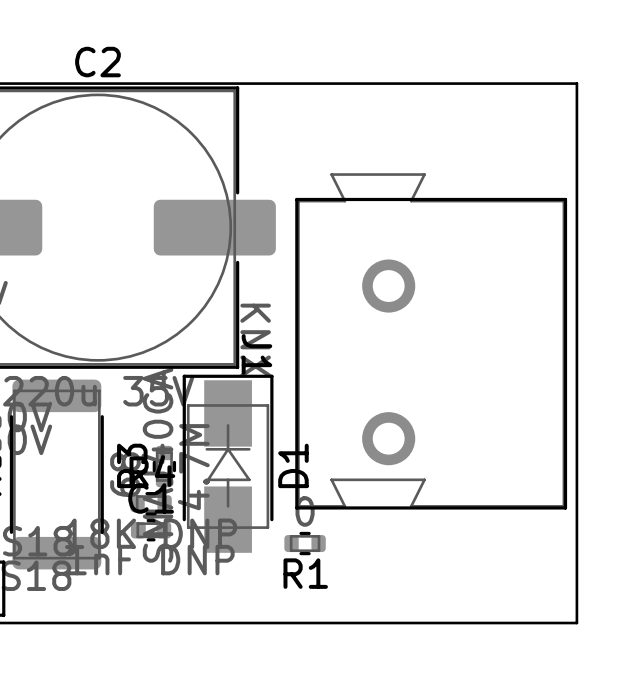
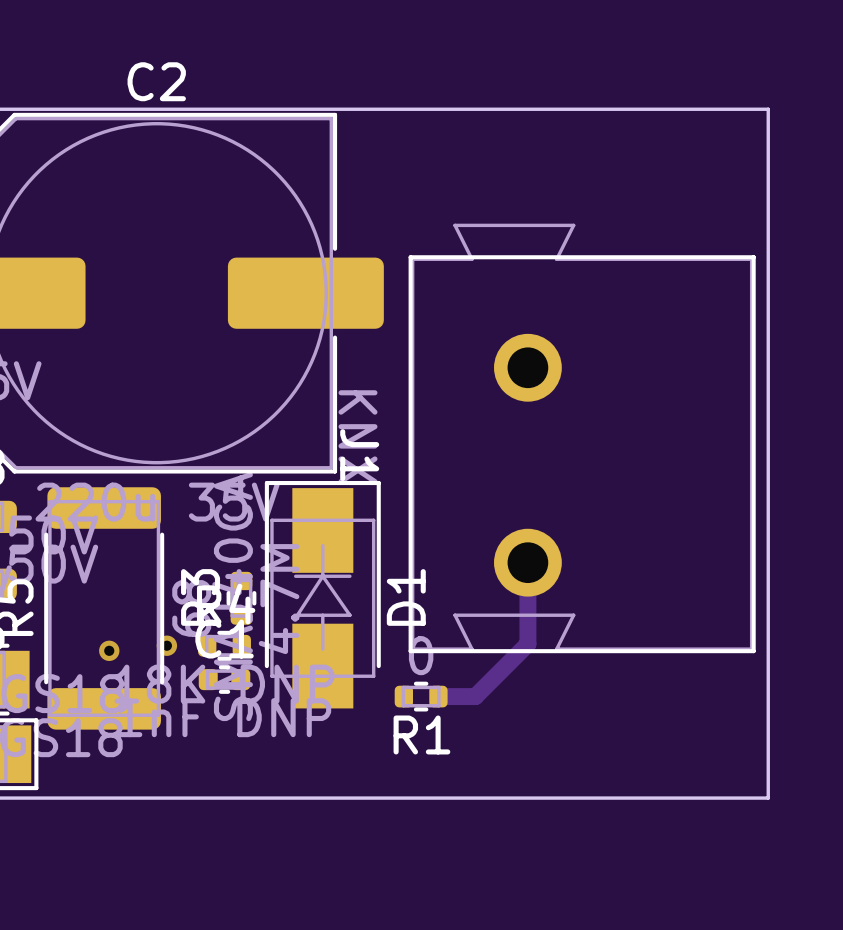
track: none -> (527, 562) (527, 644) (475, 696) (438, 696)
via: none -> (166, 645)
via: none -> (109, 650)

